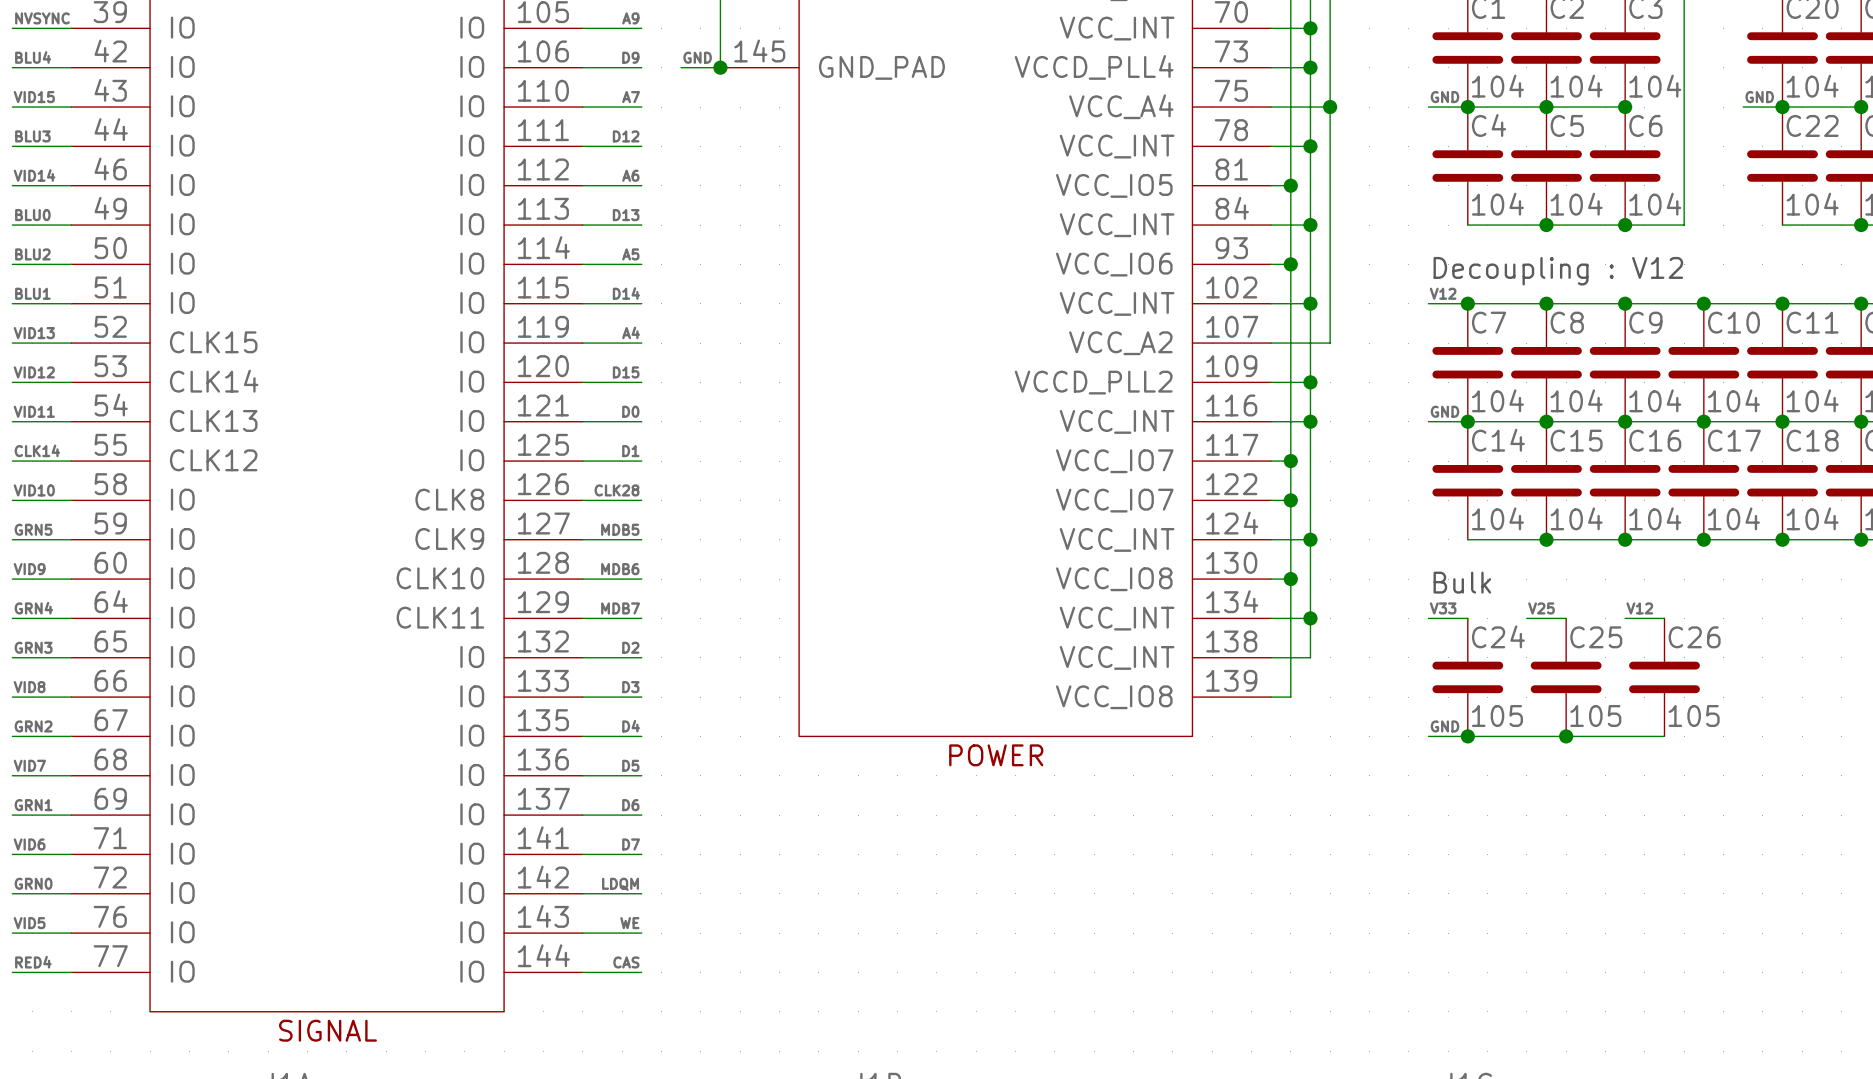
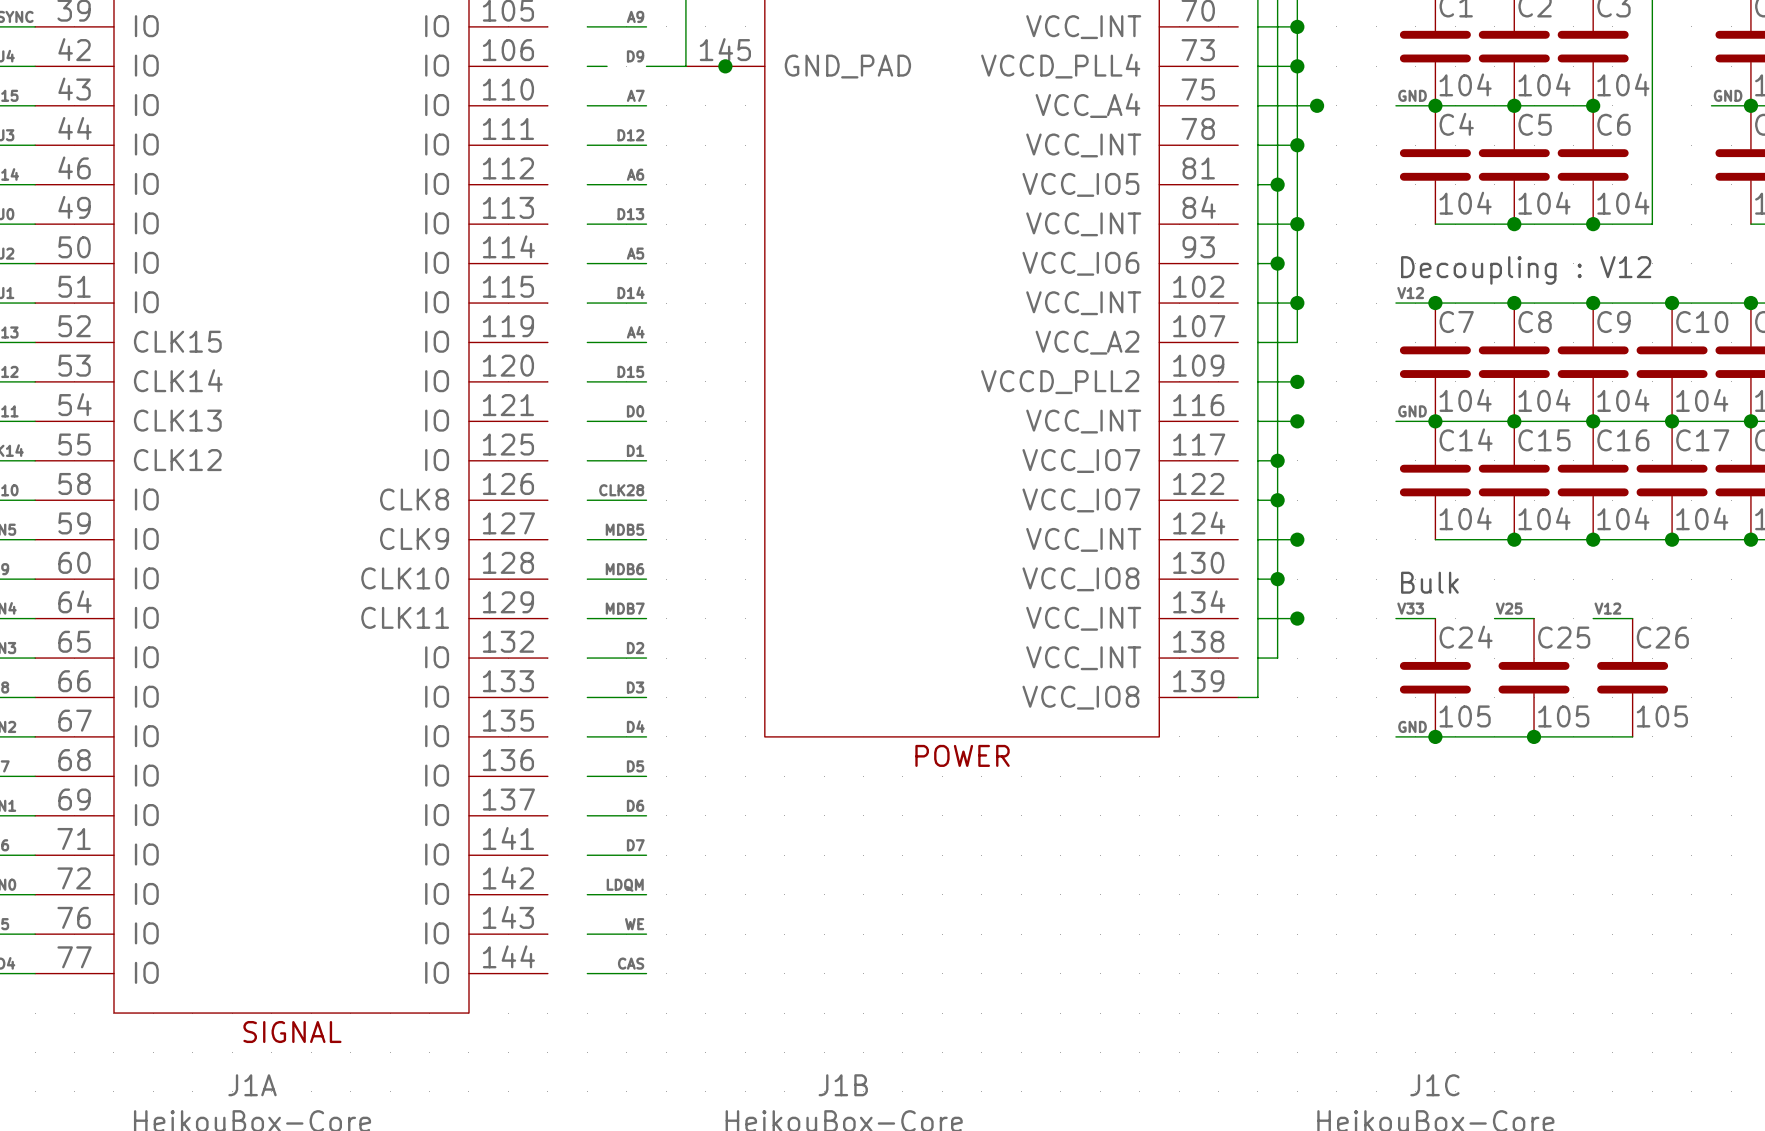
label position: A9 (630, 18) -> A9 (635, 16)
wire: (582, 28) (622, 28) -> (607, 26) (646, 26)
wire: (1271, 28) (1290, 28) -> (1277, 26) (1297, 26)
junction position: (1310, 28) -> (1297, 26)
label: D9 (630, 57) -> none
label: GND (697, 57) -> D9 (635, 56)
wire: (582, 67) (622, 67) -> none
junction position: (720, 67) -> (725, 66)
wire: (1271, 67) (1290, 67) -> (1277, 66) (1297, 66)
junction: (1310, 67) -> none
junction: none -> (1297, 66)
label position: A7 (631, 97) -> A7 (635, 95)
wire: (582, 107) (622, 107) -> (607, 105) (646, 105)
wire: (1271, 107) (1290, 107) -> (1297, 105) (1317, 105)
junction: (1330, 107) -> none
junction: none -> (1317, 105)
label position: D12 (626, 136) -> D12 (630, 135)
wire: (582, 146) (622, 146) -> (607, 145) (646, 145)
wire: (1271, 146) (1290, 146) -> (1277, 145) (1297, 145)
junction: (1310, 146) -> none
junction: none -> (1297, 145)
label position: A6 (630, 175) -> A6 (635, 174)
wire: (582, 185) (622, 185) -> (607, 184) (646, 184)
wire: (1271, 185) (1290, 185) -> (1277, 184) (1257, 184)
junction: (1290, 185) -> none
junction: none -> (1277, 184)
label position: D13 (626, 215) -> D13 (630, 214)
wire: (582, 225) (622, 225) -> (607, 224) (646, 224)
wire: (1271, 225) (1290, 225) -> (1277, 224) (1297, 224)
junction: (1310, 225) -> none
junction: none -> (1297, 224)
label position: A5 (630, 254) -> A5 (635, 253)
wire: (582, 264) (622, 264) -> (607, 263) (646, 263)
wire: (1271, 264) (1290, 264) -> (1277, 263) (1257, 263)
junction: (1290, 264) -> none
junction: none -> (1277, 263)
label position: D14 (626, 293) -> D14 (631, 292)
wire: (582, 303) (622, 303) -> (607, 303) (646, 303)
wire: (1271, 303) (1290, 303) -> (1277, 303) (1297, 303)
junction: (1310, 303) -> none
junction: none -> (1297, 303)
label position: A4 (631, 332) -> A4 (635, 332)
wire: (582, 343) (622, 343) -> (607, 342) (646, 342)
wire: (1271, 343) (1290, 343) -> none
label position: D15 (626, 372) -> D15 (630, 371)
wire: (582, 382) (622, 382) -> (607, 381) (646, 381)
wire: (1271, 382) (1290, 382) -> (1277, 381) (1297, 381)
junction position: (1310, 382) -> (1297, 381)
label position: D0 (630, 411) -> D0 (635, 411)
wire: (582, 421) (622, 421) -> (607, 421) (646, 421)
wire: (1271, 421) (1290, 421) -> (1277, 421) (1297, 421)
junction: (1310, 421) -> none
junction: none -> (1297, 421)
label position: D1 (630, 451) -> D1 (635, 450)
wire: (582, 461) (622, 461) -> (607, 460) (646, 460)
wire: (1271, 461) (1290, 461) -> (1277, 460) (1257, 460)
junction: (1290, 461) -> none
junction: none -> (1277, 460)
label position: CLK28 (617, 490) -> CLK28 (621, 490)
wire: (582, 500) (622, 500) -> (607, 500) (646, 500)
wire: (1271, 500) (1290, 500) -> (1277, 500) (1257, 500)
junction: (1290, 500) -> none
junction: none -> (1277, 500)
label position: MDB5 (620, 529) -> MDB5 (624, 529)
wire: (582, 539) (622, 539) -> (607, 539) (646, 539)
wire: (1271, 539) (1290, 539) -> (1277, 539) (1297, 539)
junction: (1310, 539) -> none
junction: none -> (1297, 539)
label position: MDB6 (620, 569) -> MDB6 (624, 569)
wire: (582, 579) (622, 579) -> (607, 579) (646, 579)
wire: (1271, 579) (1290, 579) -> (1277, 579) (1257, 579)
junction: (1290, 579) -> none
junction: none -> (1277, 579)
label position: MDB7 (620, 608) -> MDB7 (625, 608)
wire: (582, 618) (622, 618) -> (607, 618) (646, 618)
wire: (1271, 618) (1290, 618) -> (1277, 618) (1297, 618)
junction: (1310, 618) -> none
junction: none -> (1297, 618)
label position: D2 (630, 647) -> D2 (635, 648)
wire: (582, 657) (622, 657) -> (607, 658) (646, 658)
wire: (1271, 657) (1290, 657) -> none
label position: D3 (630, 687) -> D3 (635, 687)
wire: (582, 697) (622, 697) -> (607, 697) (646, 697)
label position: D4 (631, 726) -> D4 (635, 726)
wire: (582, 736) (622, 736) -> (607, 736) (646, 736)
label position: D5 (630, 765) -> D5 (635, 766)
wire: (582, 775) (622, 775) -> (607, 776) (646, 776)
label position: D6 (630, 805) -> D6 (635, 805)
wire: (582, 815) (622, 815) -> (607, 815) (646, 815)
label position: D7 (631, 844) -> D7 (635, 845)
wire: (582, 854) (622, 854) -> (607, 855) (646, 855)
label position: LDQM (620, 884) -> LDQM (625, 885)
wire: (582, 893) (622, 893) -> (607, 894) (646, 894)
label position: WE (629, 923) -> WE (634, 924)
wire: (582, 933) (622, 933) -> (607, 934) (646, 934)
label position: CAS (626, 962) -> CAS (631, 963)
wire: (582, 972) (622, 972) -> (607, 973) (646, 973)

